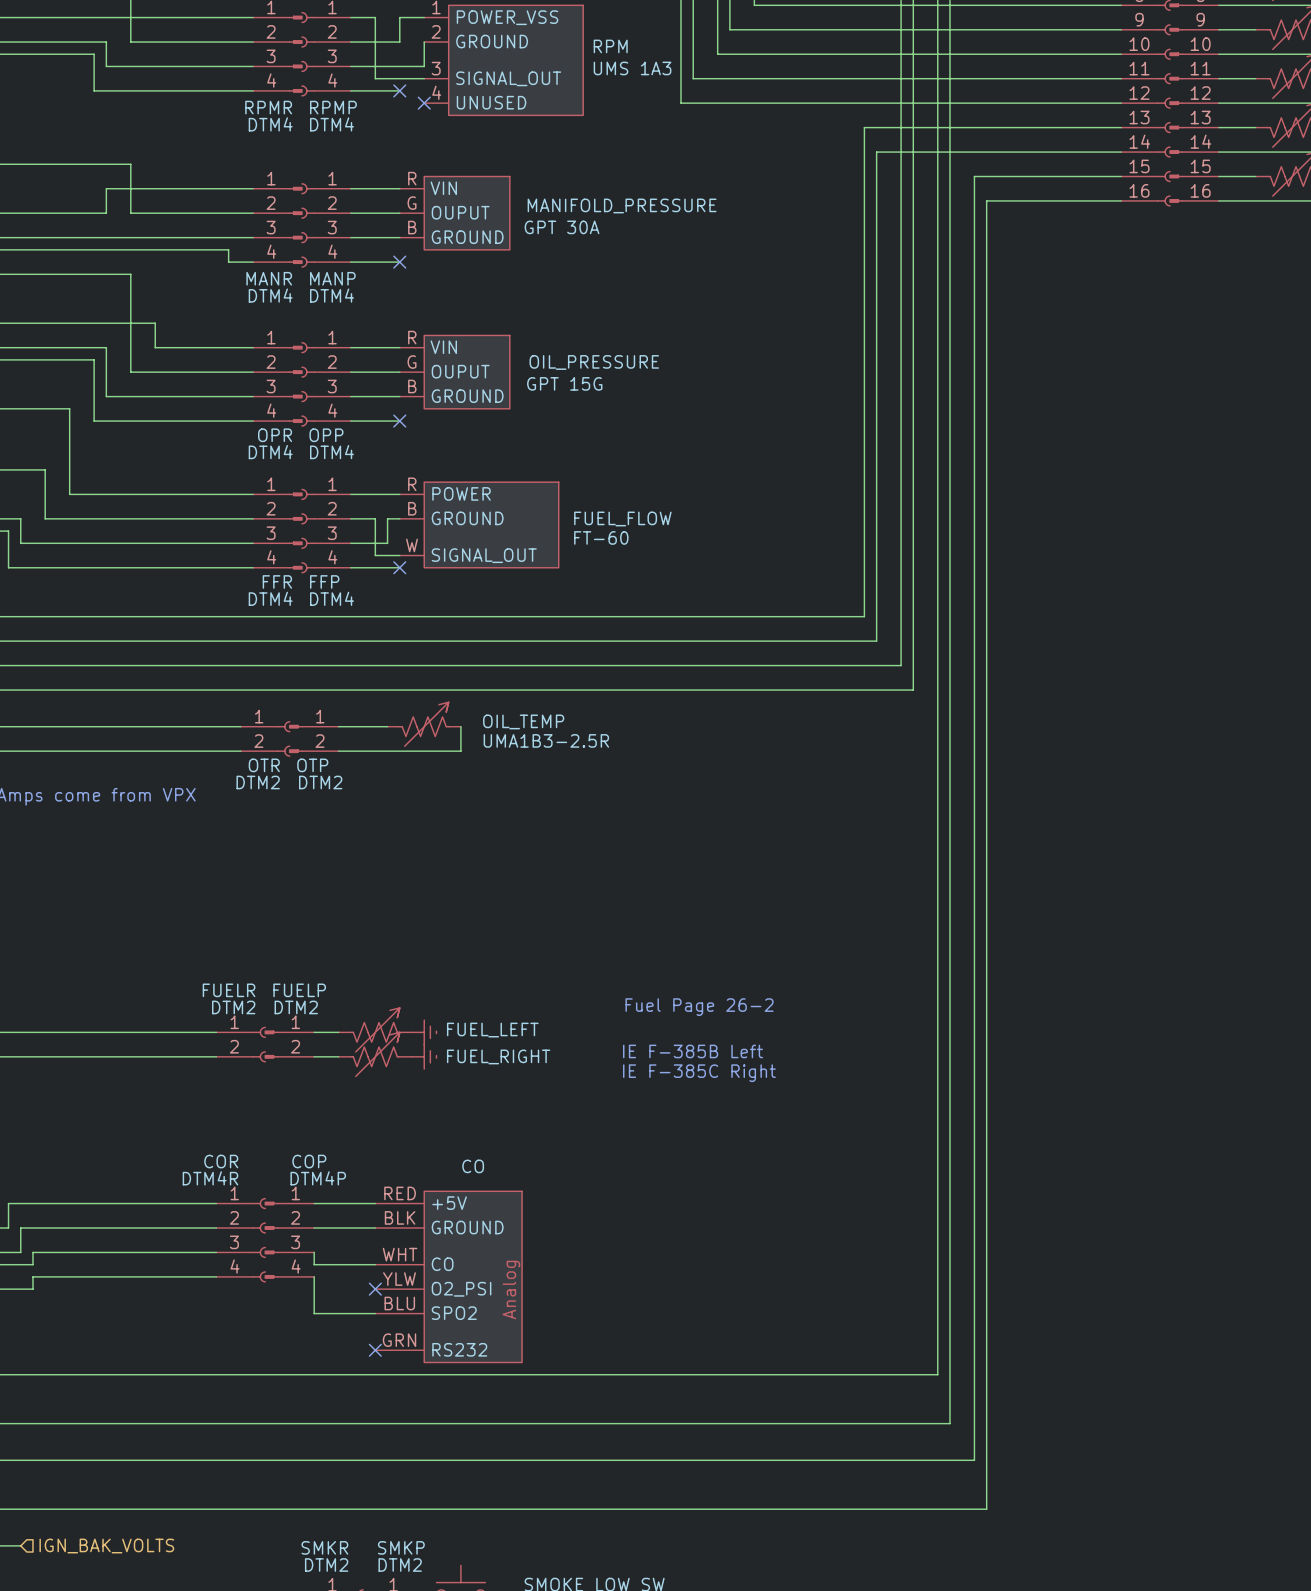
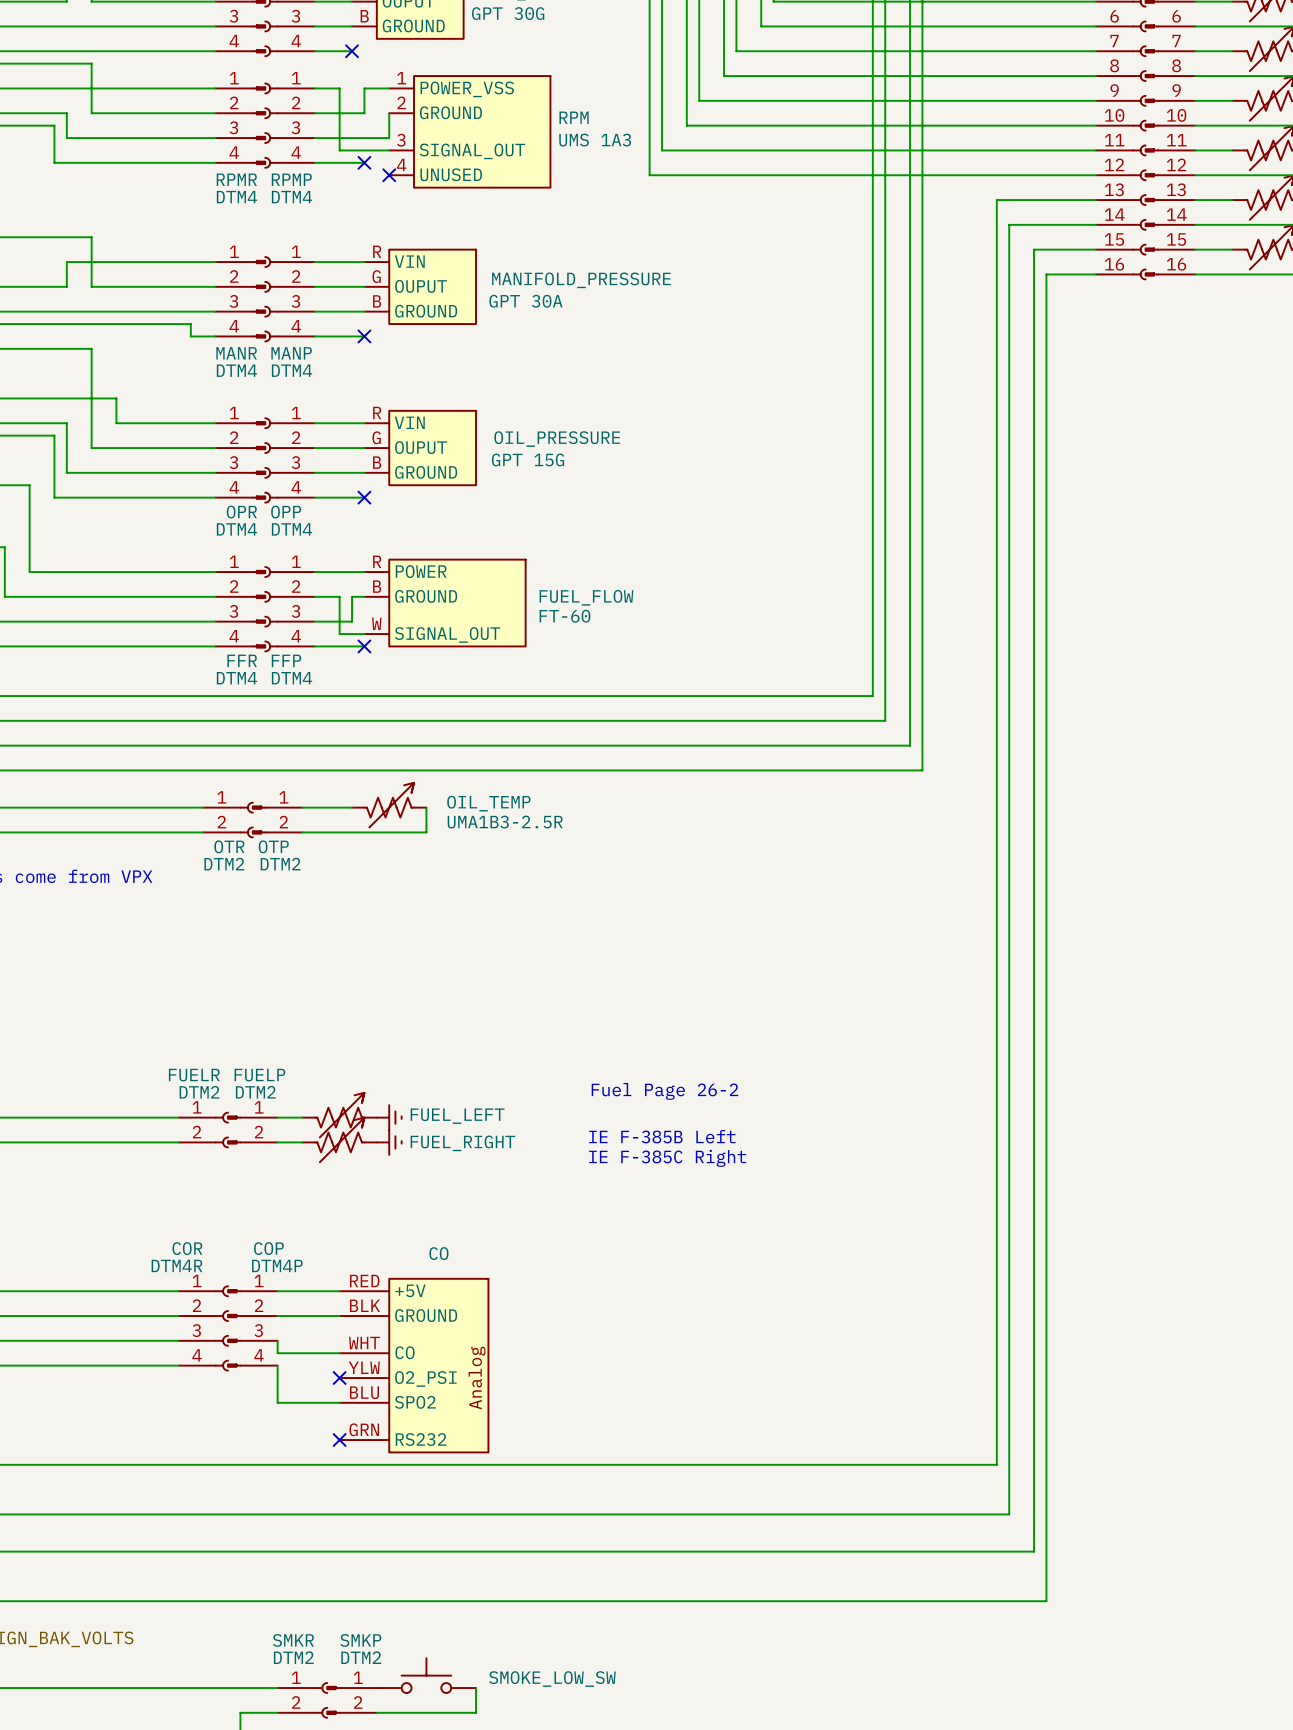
wire: (1023, 127) (864, 127) (864, 616) -> none
wire: (1035, 152) (876, 152) (876, 641) -> none
wire: (1060, 176) (974, 176) (974, 1460) -> (1034, 249) (1034, 1551) (947, 1551)
wire: (1072, 200) (986, 200) (986, 1509) -> (1046, 274) (1046, 1601) (959, 1601)
wire: (901, 616) (901, 665) -> (872, 696) (835, 696)
wire: (913, 641) (913, 690) -> (885, 720) (848, 720)
wire: none -> (872, 745) (910, 745)
wire: (937, 665) (937, 1374) -> (996, 200) (996, 1464) (910, 1464)
wire: none -> (885, 770) (922, 770)
wire: (949, 690) (949, 1423) -> (1009, 224) (1009, 1514) (922, 1514)

